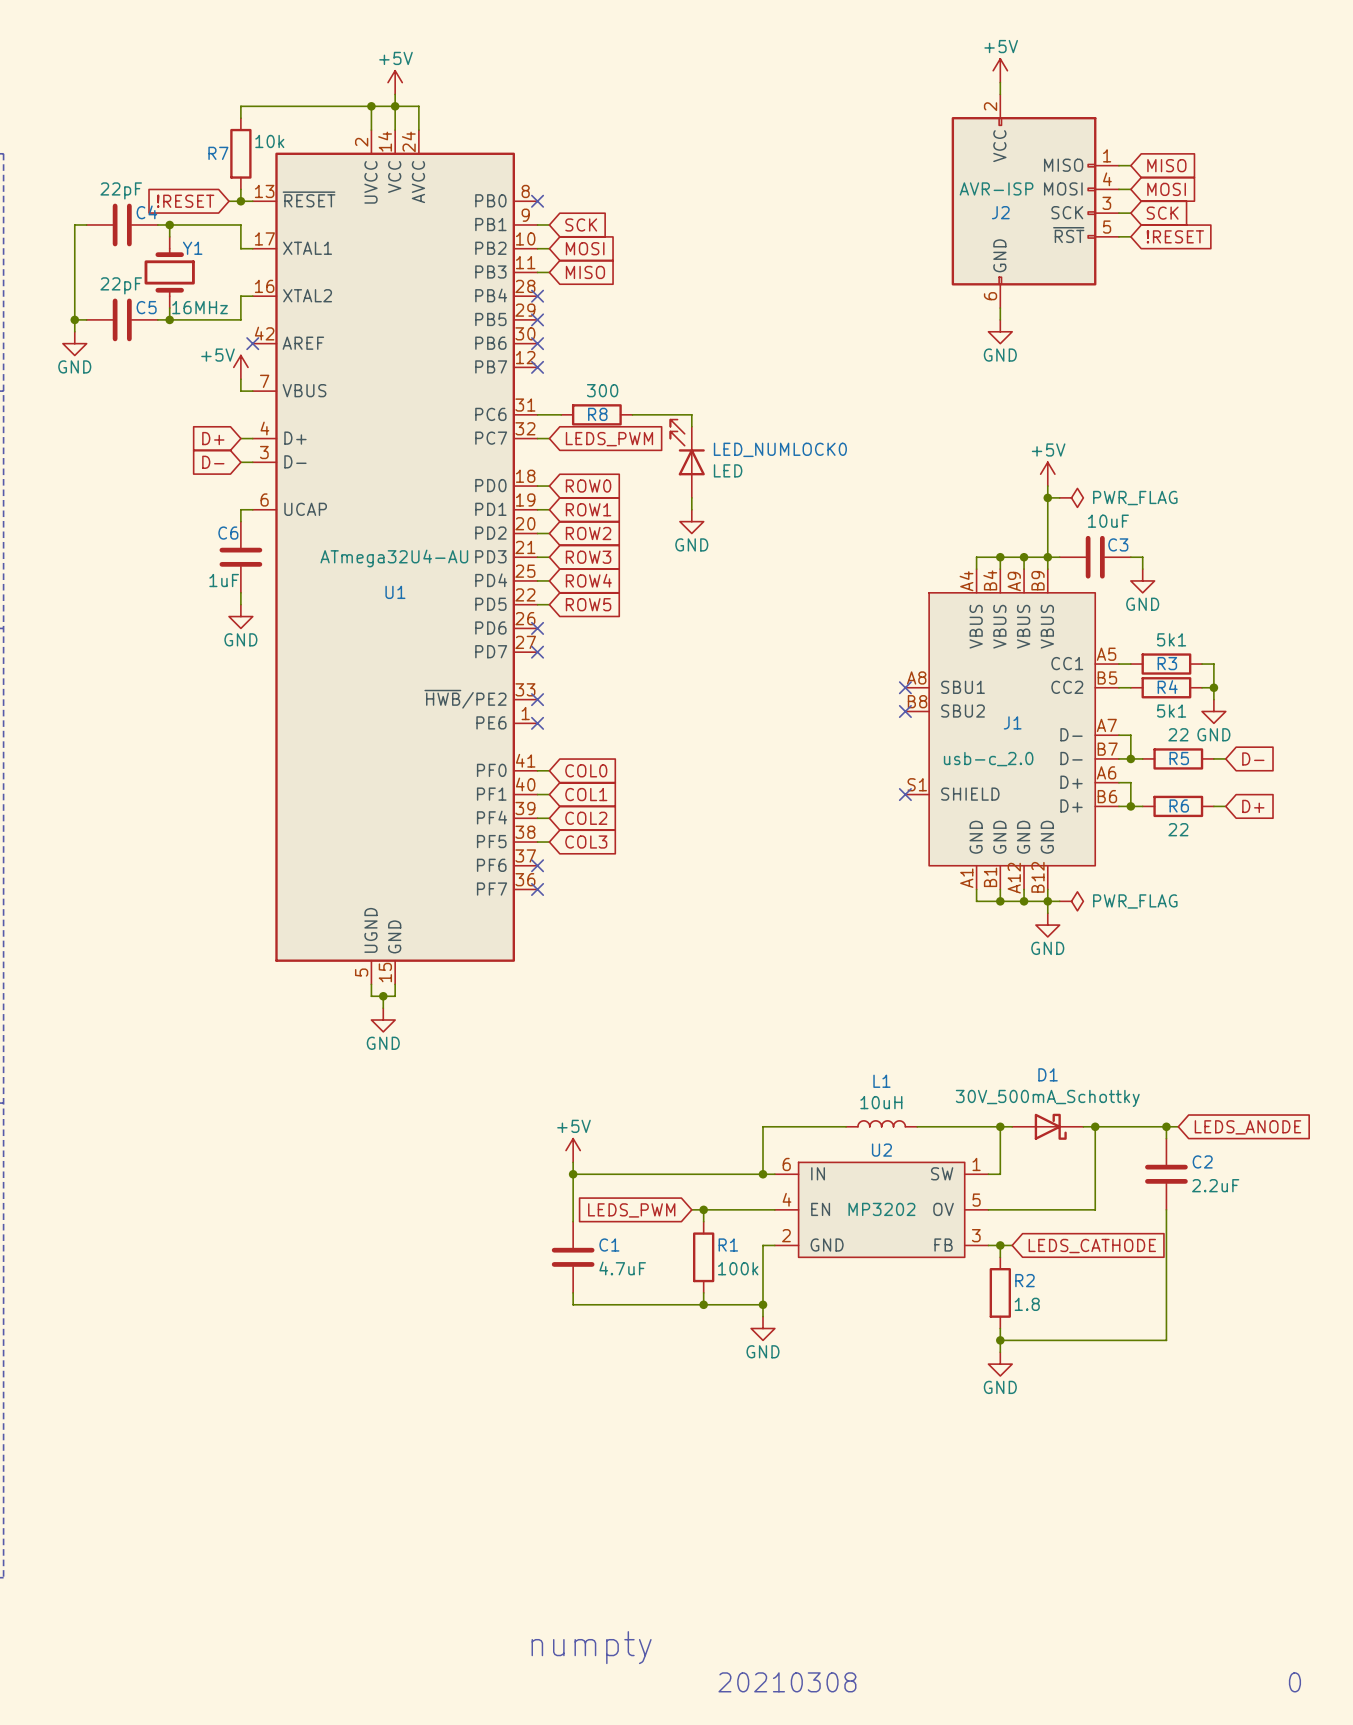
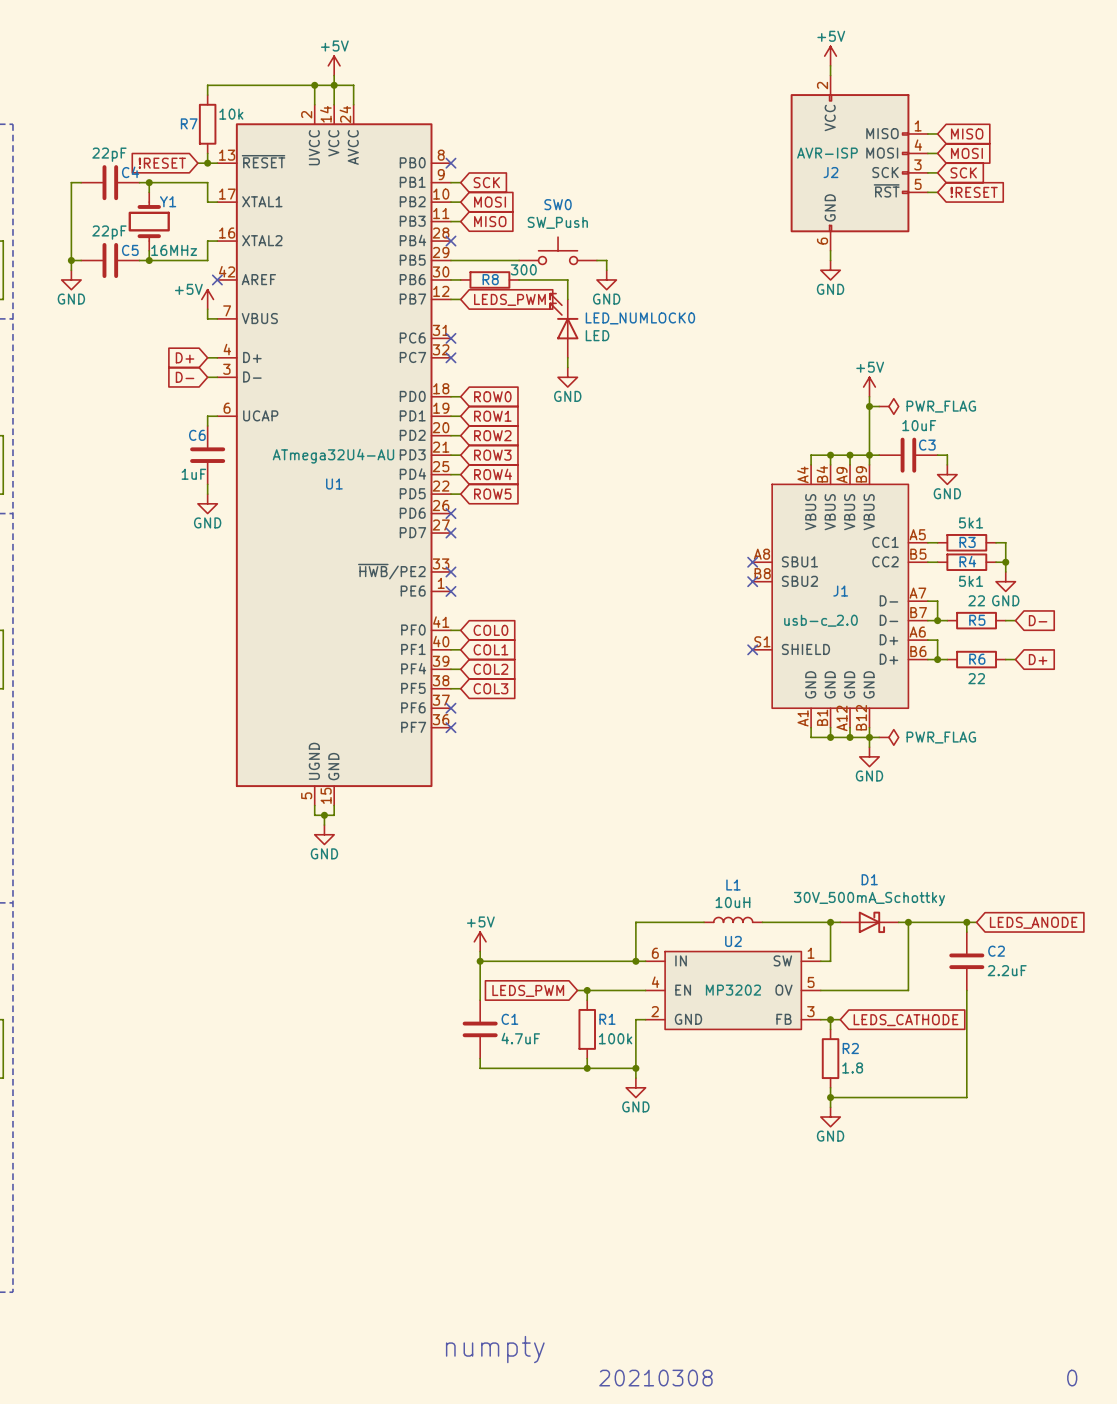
SW0: none -> SW_Push (558, 250)
wire: none -> (450, 260) (519, 260)
no-connect mark: (537, 319) -> none
wire: none -> (596, 260) (606, 260) (606, 270)
wire: none -> (450, 279) (460, 279)
no-connect mark: (537, 343) -> none
wire: none -> (519, 279) (567, 279) (567, 299)
power symbol: none -> GND (606, 279)
no-connect mark: (537, 367) -> none
R8 value position: 300 (602, 390) -> 300 (523, 269)
wire: (537, 414) (561, 414) -> none
no-connect mark: none -> (450, 338)
R8 position: (596, 414) -> (489, 279)
wire: (632, 414) (691, 414) (691, 426) -> none
wire: (537, 438) (549, 438) -> (450, 299) (460, 299)
no-connect mark: none -> (450, 357)
global label position: LEDS_PWM (609, 439) -> LEDS_PWM (509, 299)
LED_NUMLOCK0 position: (687, 458) -> (564, 325)
wire: (691, 497) (691, 509) -> (567, 357) (567, 367)
power symbol position: GND (691, 521) -> GND (567, 377)

